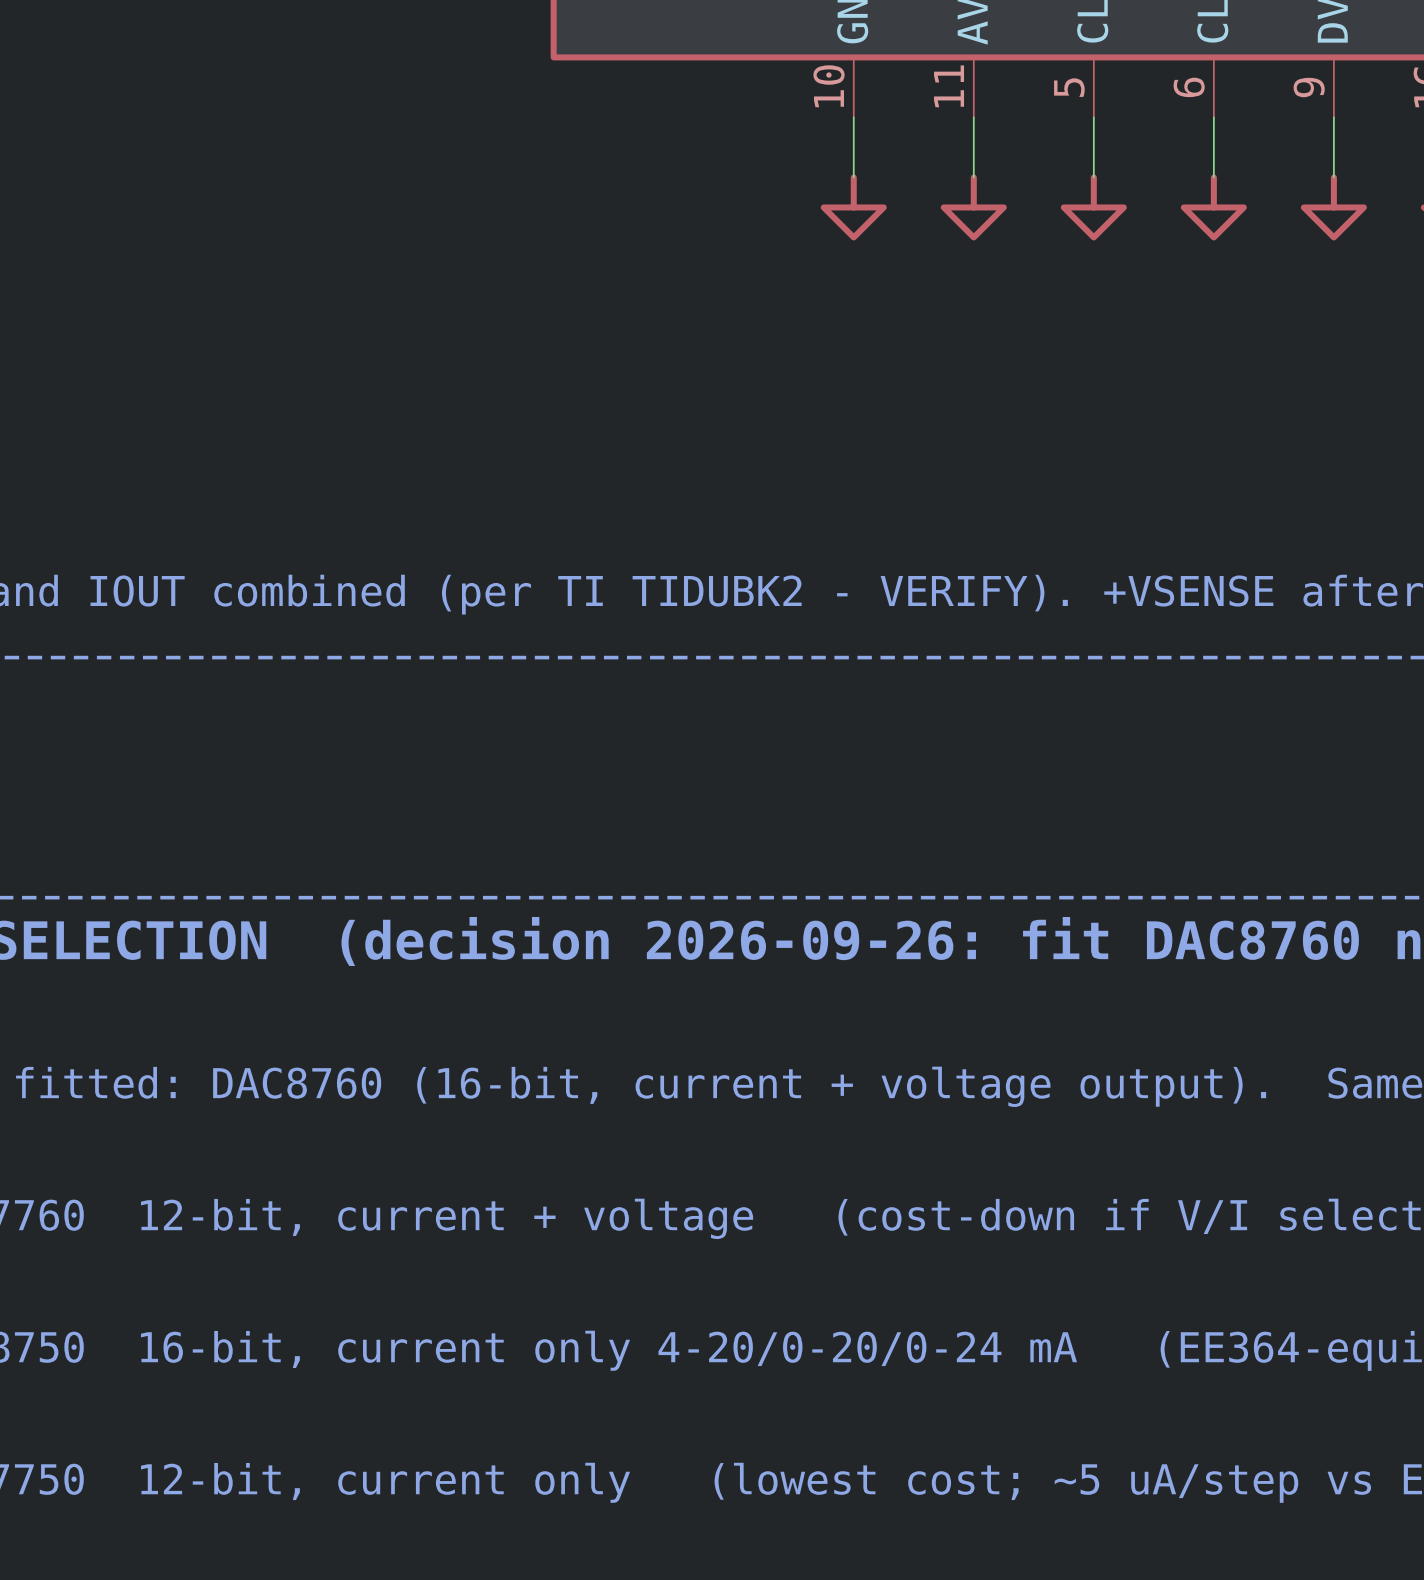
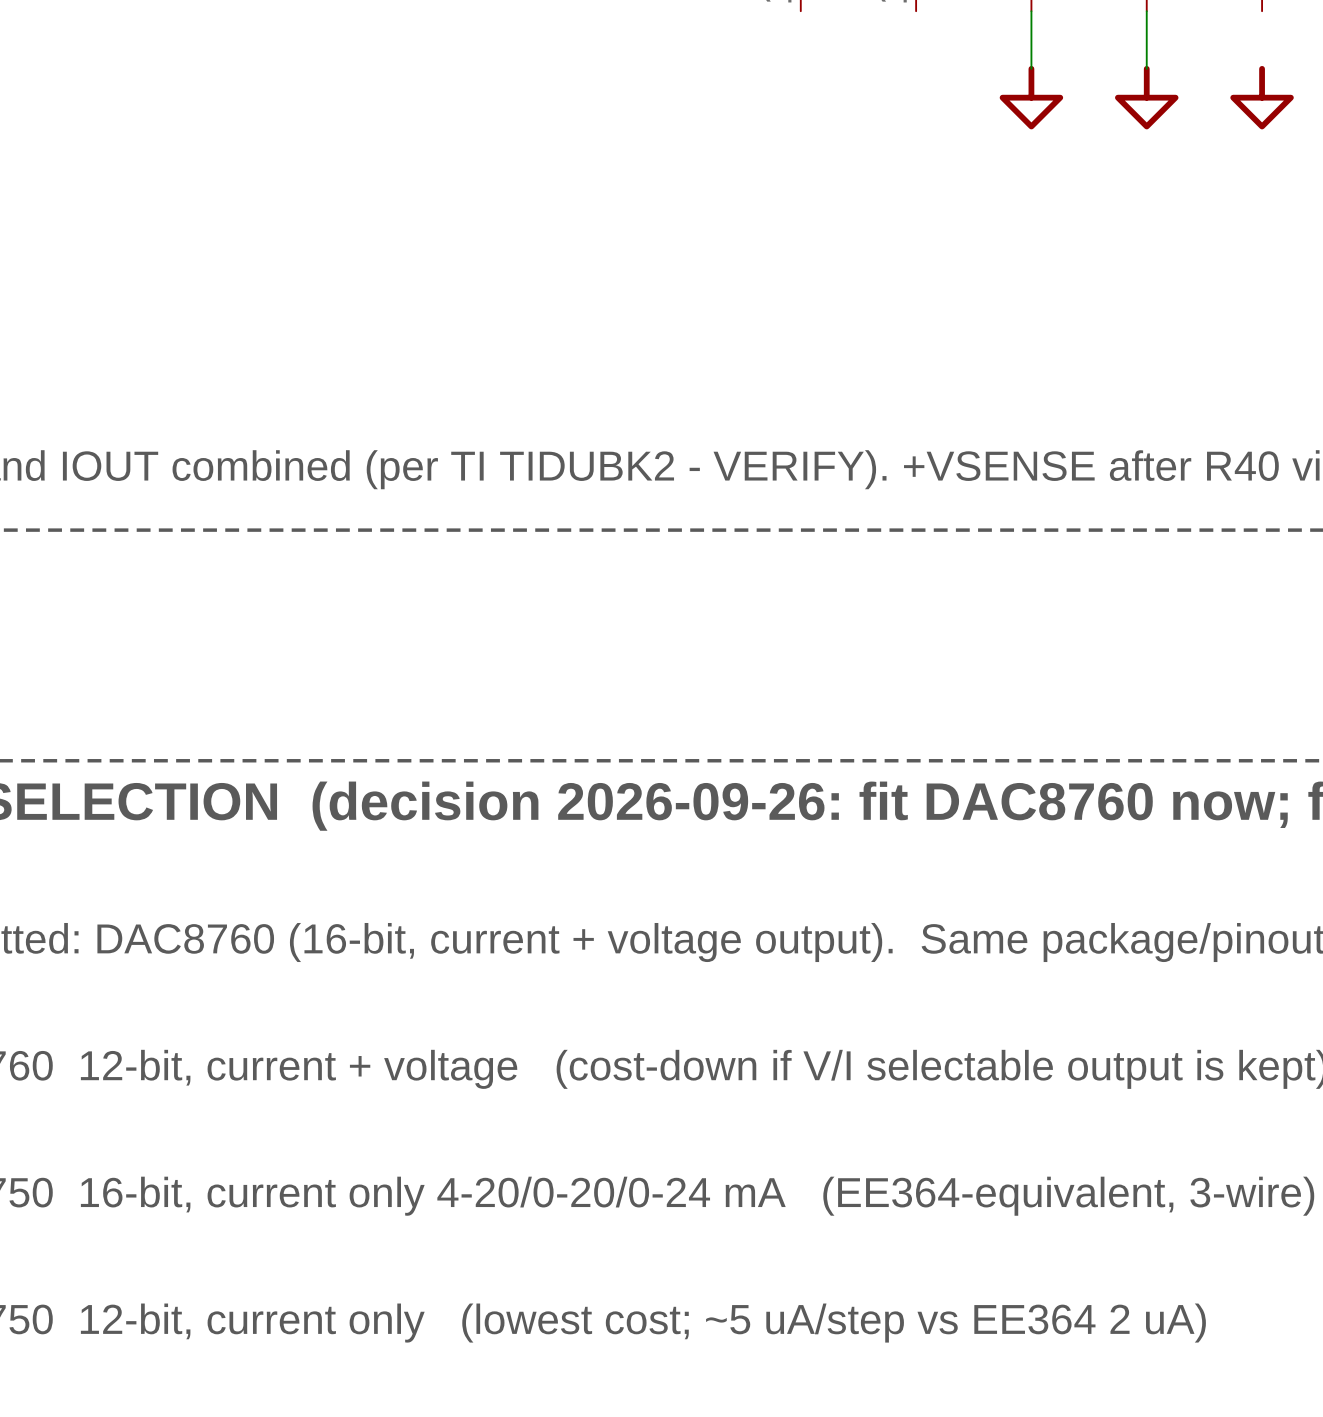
wire: (853, 117) (853, 177) -> none
wire: (973, 117) (973, 177) -> none
wire: (1333, 117) (1333, 177) -> none
power symbol: (853, 207) -> none
power symbol: (973, 207) -> none

